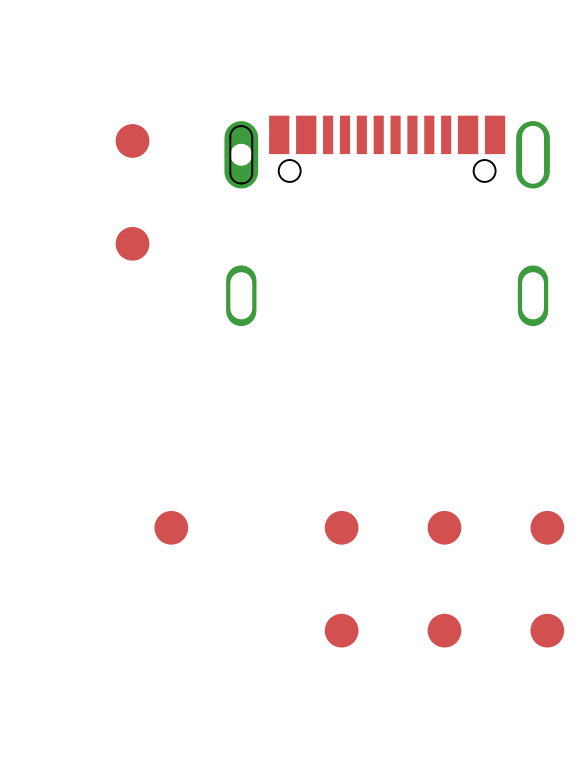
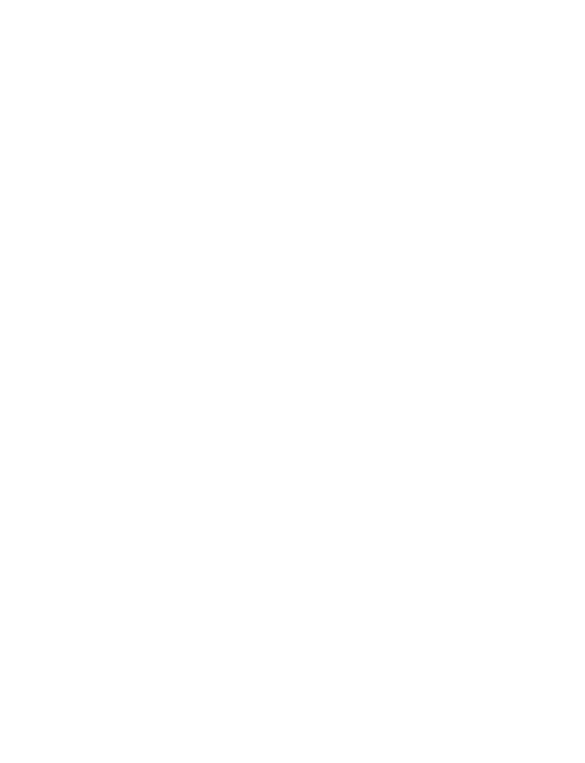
part: (132, 140) -> none
part: (387, 220) -> none
part: (132, 243) -> none
part: (171, 527) -> none
part: (341, 527) -> none
part: (444, 527) -> none
part: (547, 527) -> none
part: (341, 630) -> none
part: (444, 630) -> none
part: (547, 630) -> none

